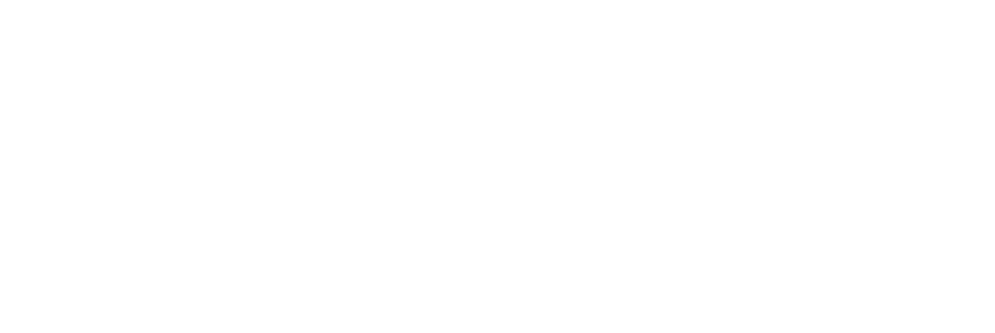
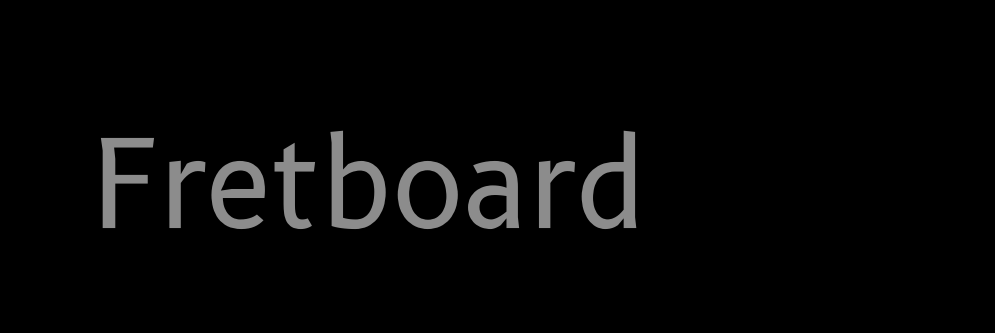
text: none -> Fretboard (368, 179)

